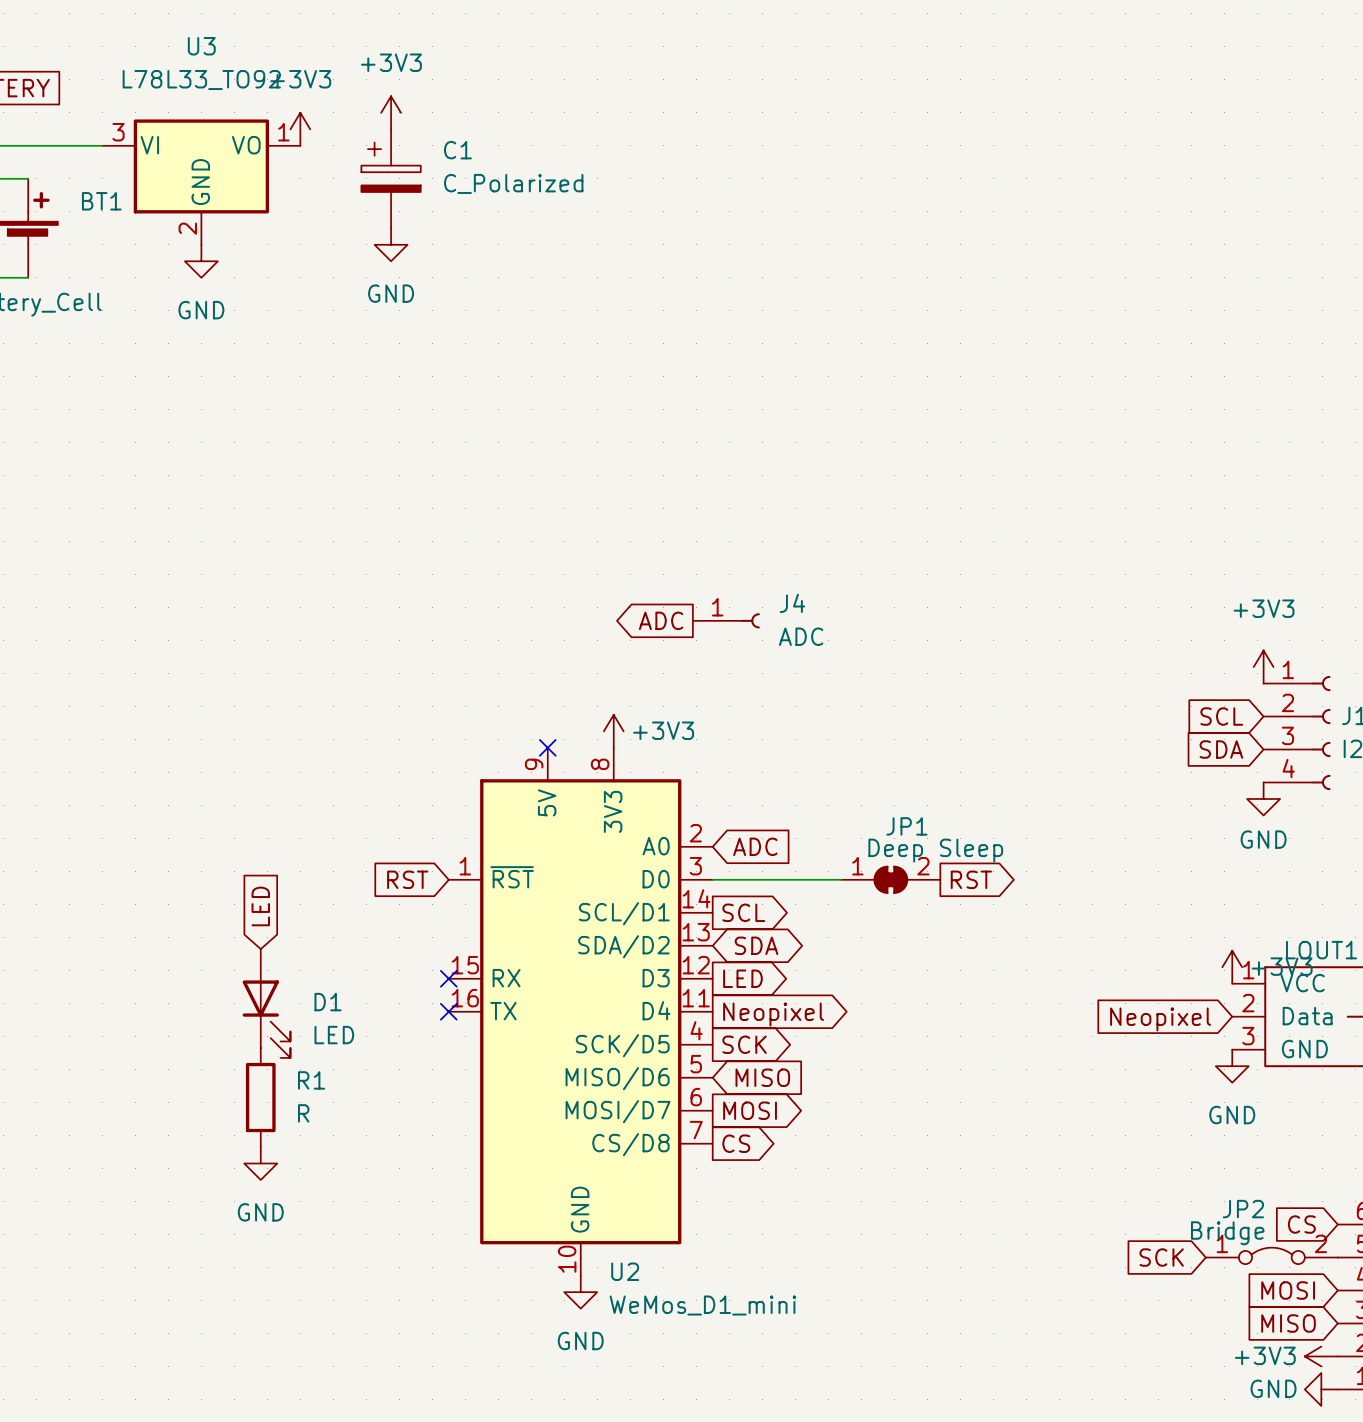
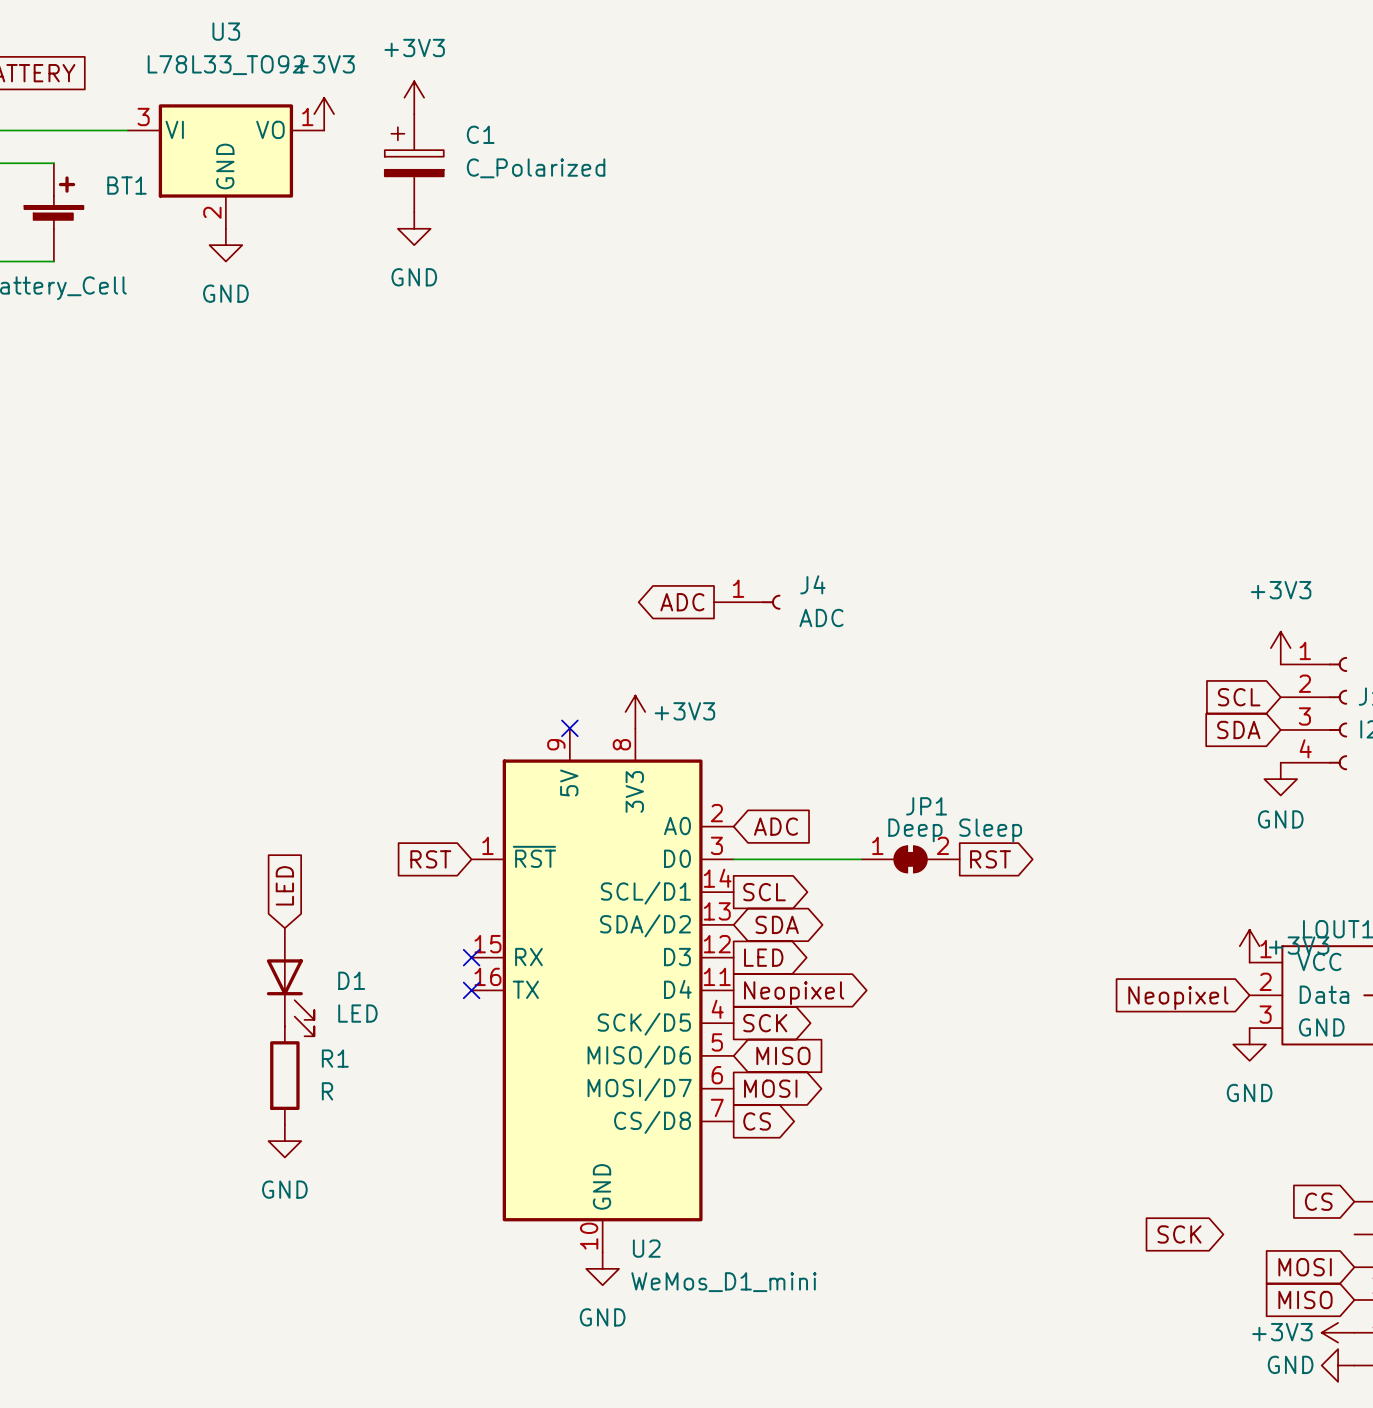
JP2: Bridge (1271, 1255) -> none

